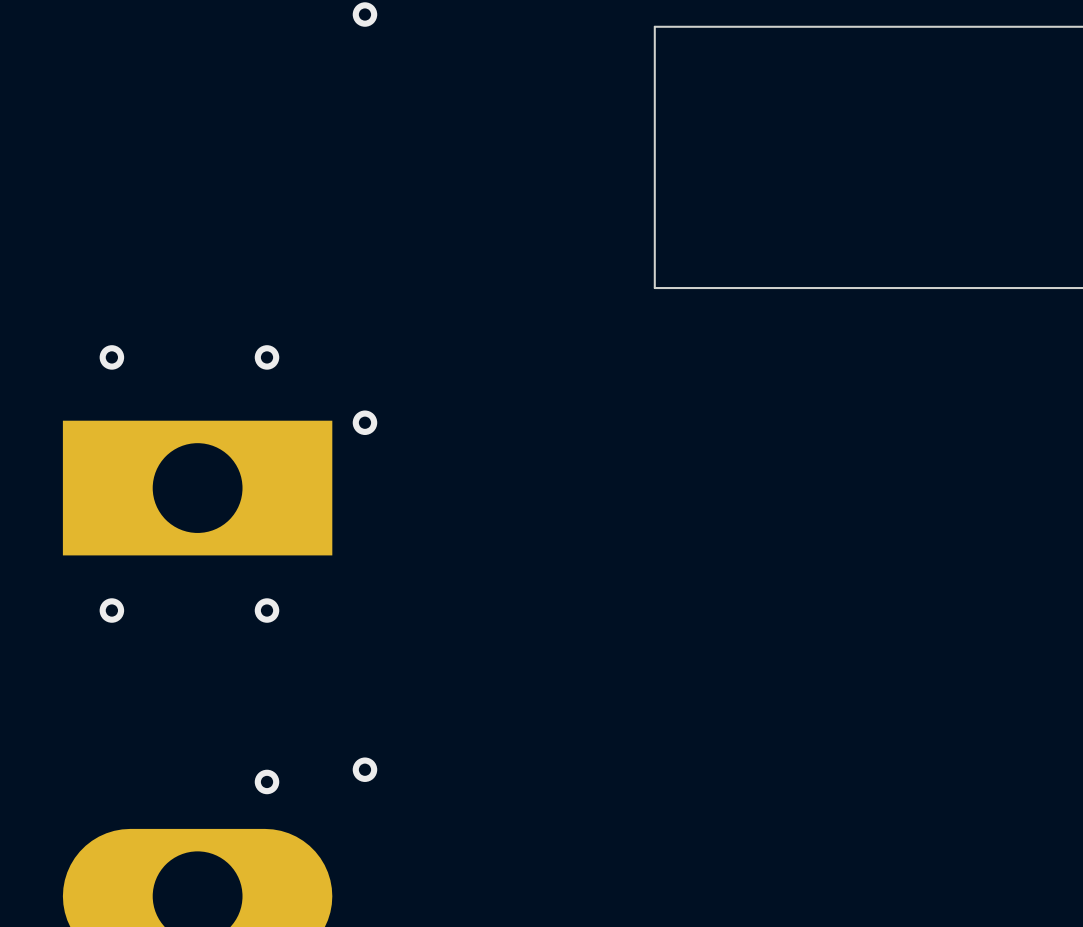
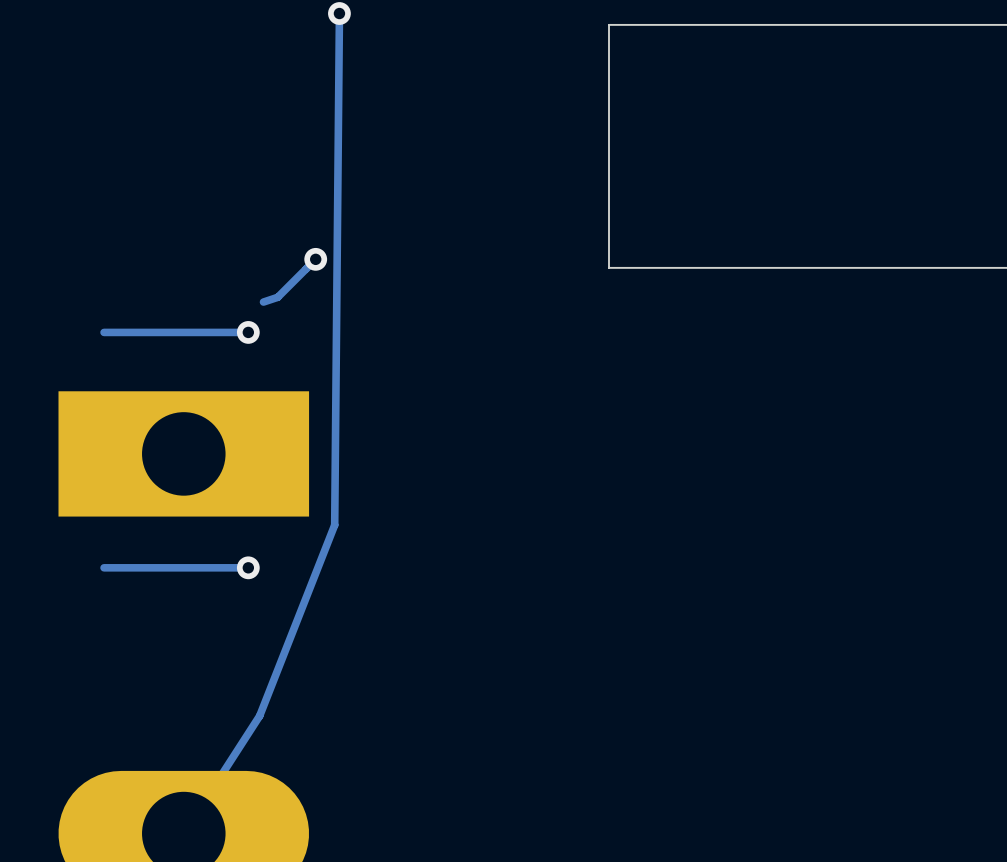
track: none -> (339, 13) (334, 525) (259, 715) (183, 833)
track: none -> (315, 259) (277, 297) (263, 302)
via: none -> (315, 259)
via: (111, 357) -> none
track: none -> (248, 332) (104, 332)
via: (364, 422) -> none
via: (111, 610) -> none
track: none -> (248, 567) (104, 567)
via: (364, 769) -> none
via: (267, 781) -> none

